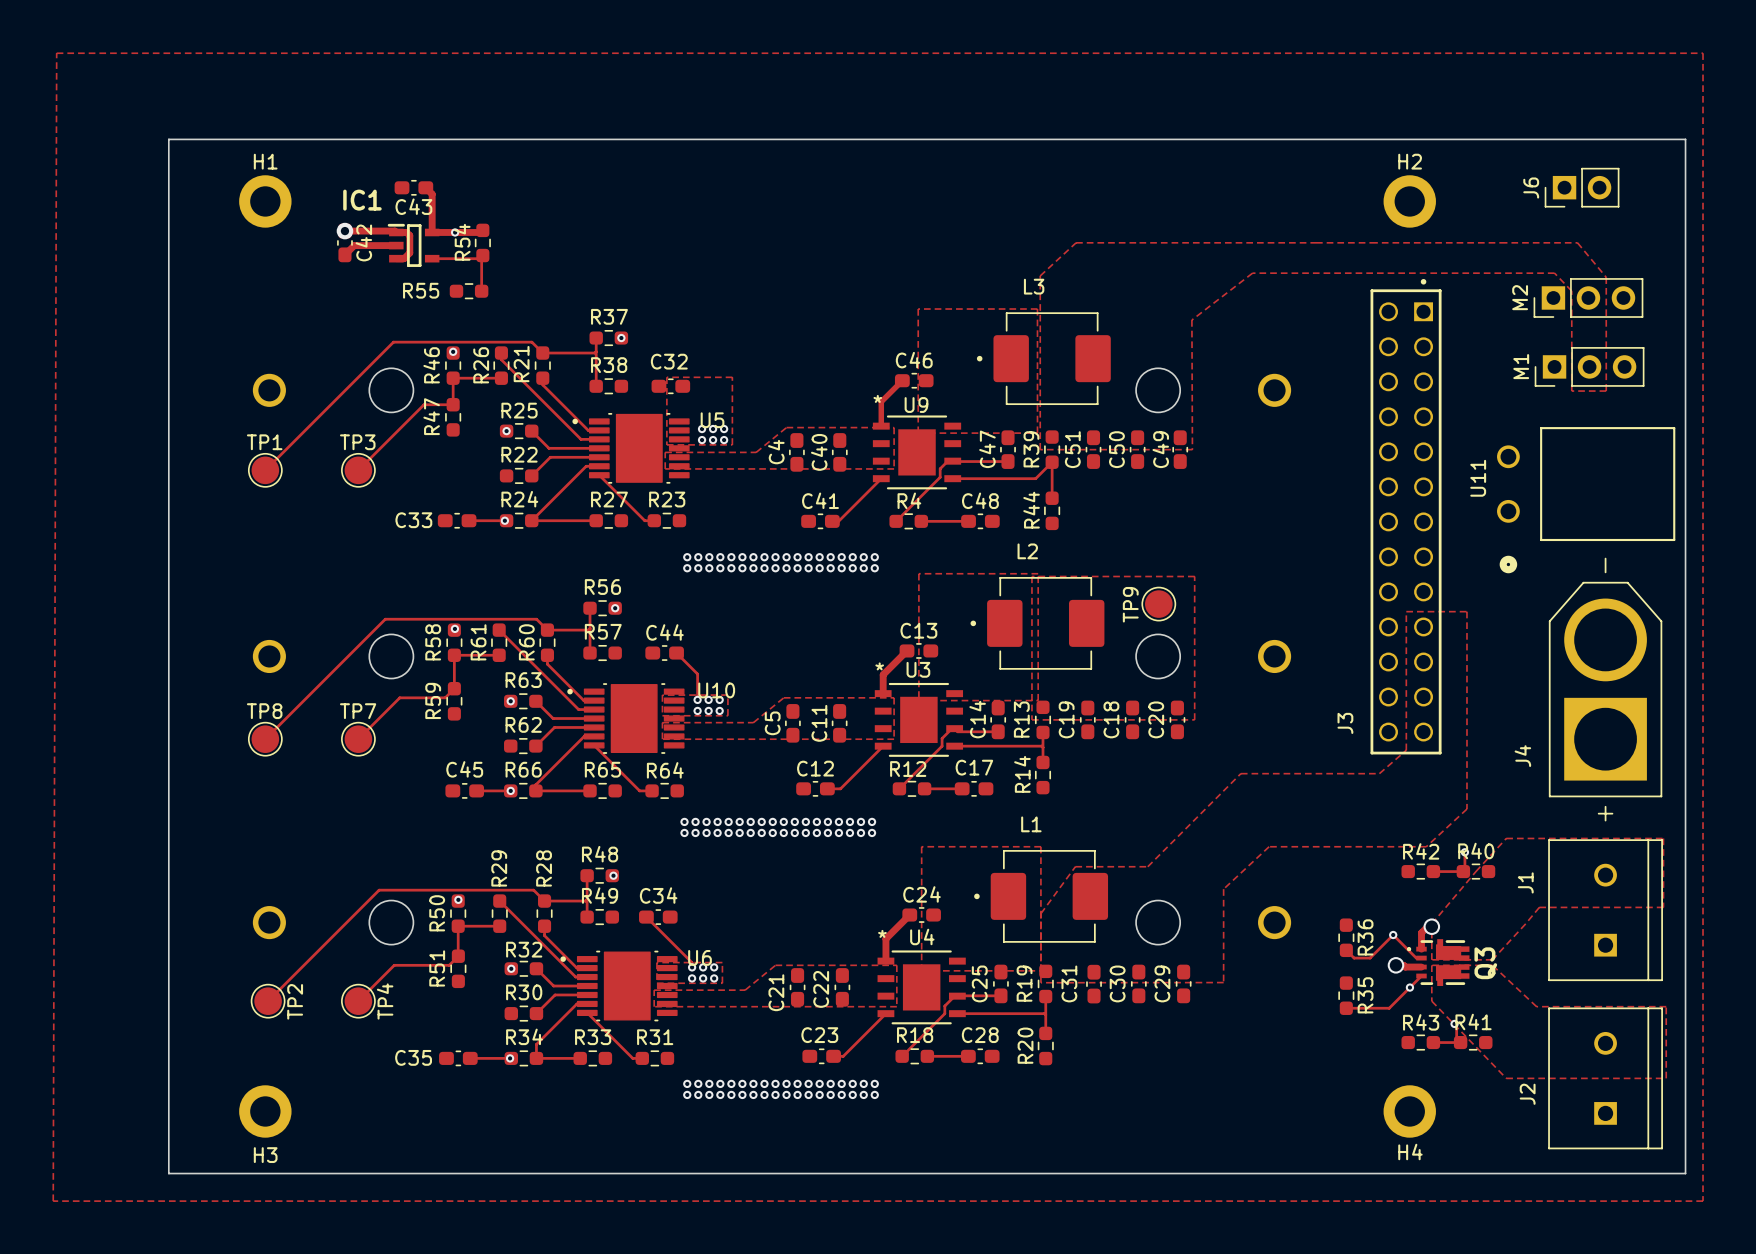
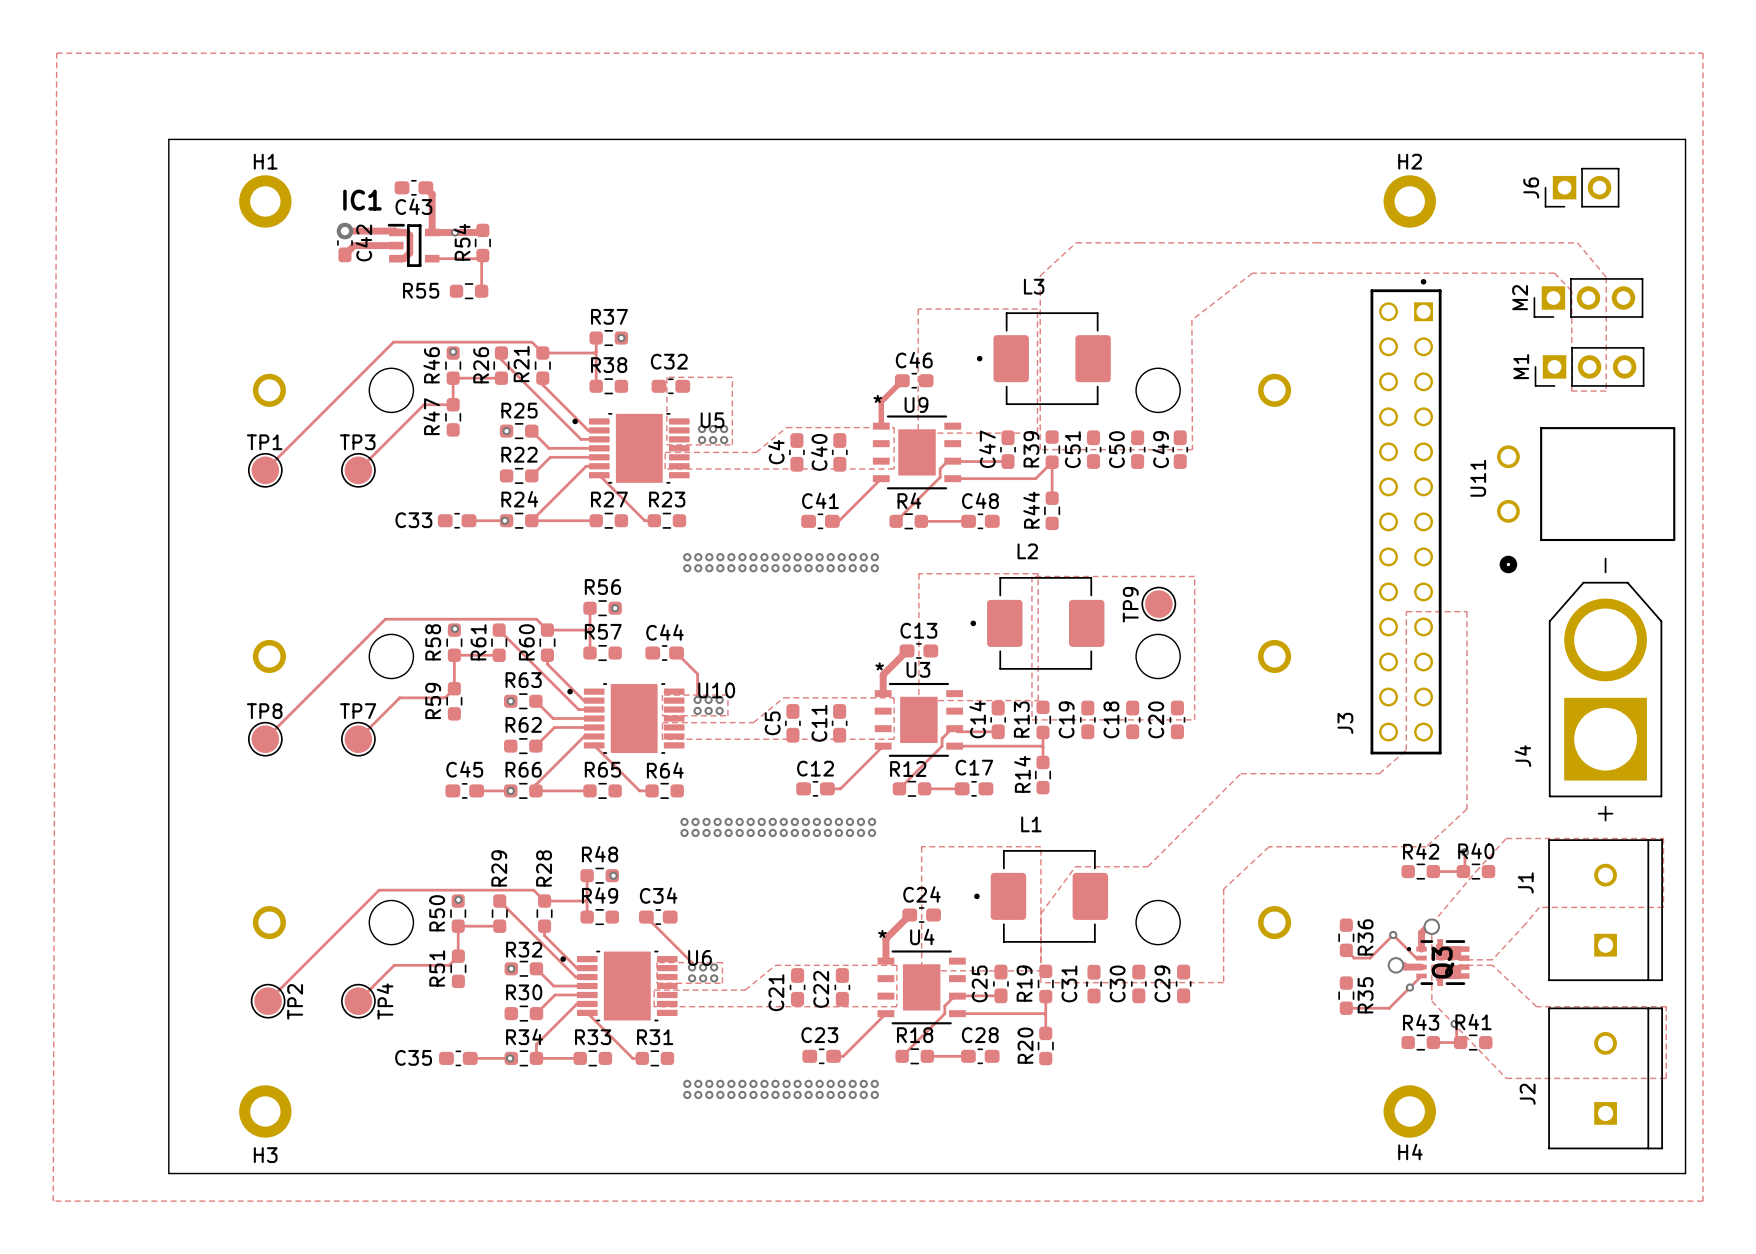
Q3 name position: Q3 (1485, 963) -> Q3 (1443, 962)

